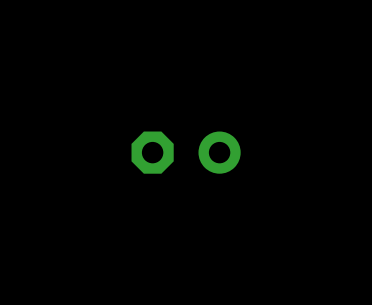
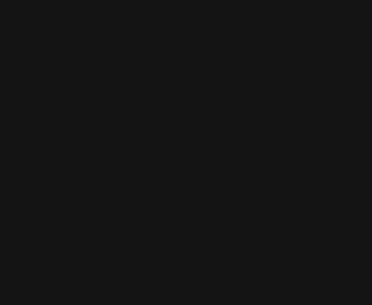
part: (186, 152) -> none

